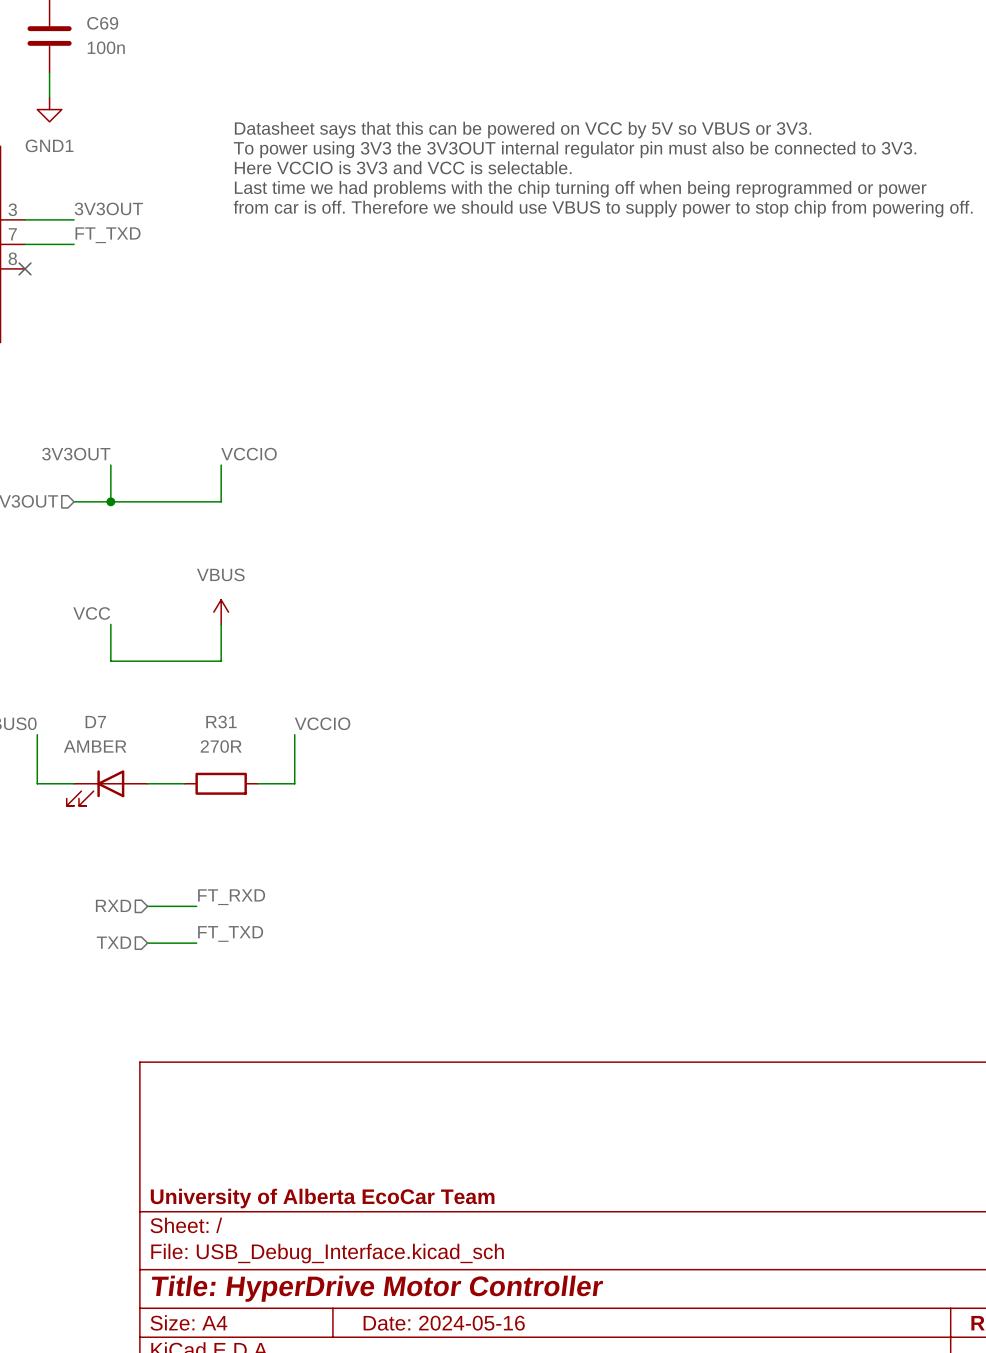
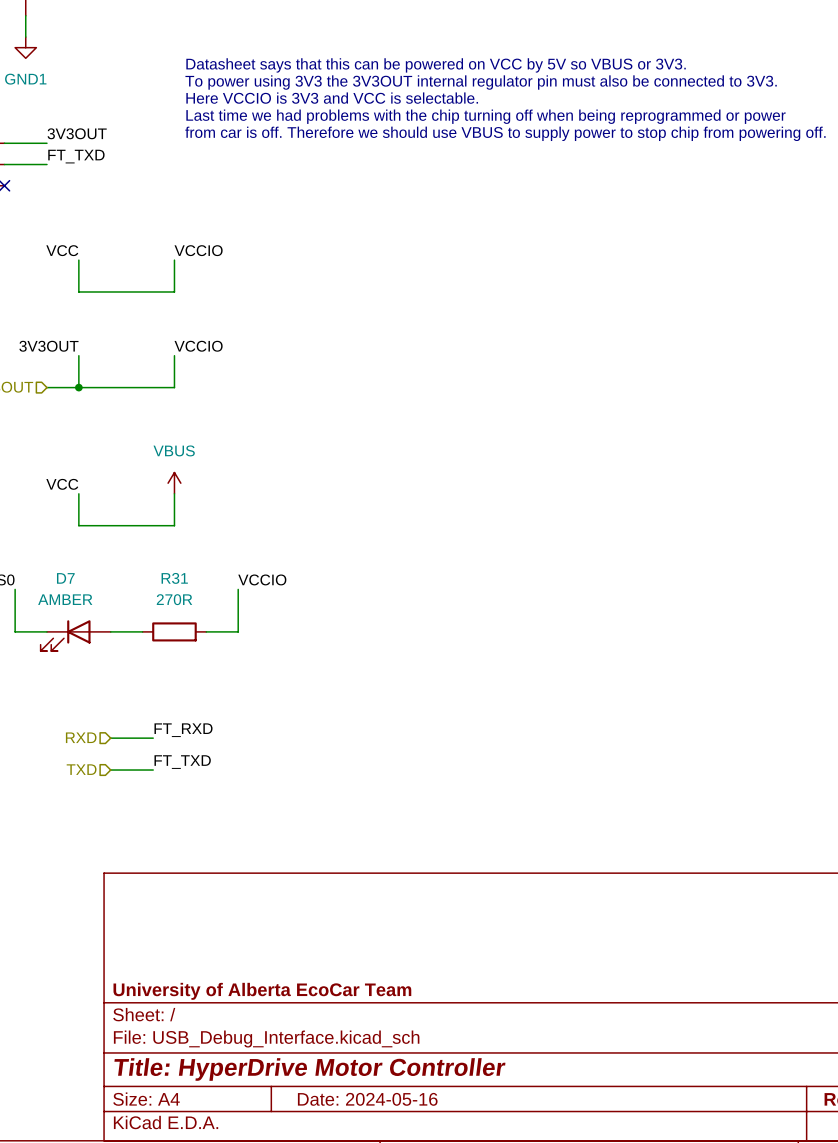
label: none -> VCC (62, 250)
label: none -> VCCIO (198, 250)
wire: none -> (78, 260) (78, 291) (174, 291) (174, 260)

